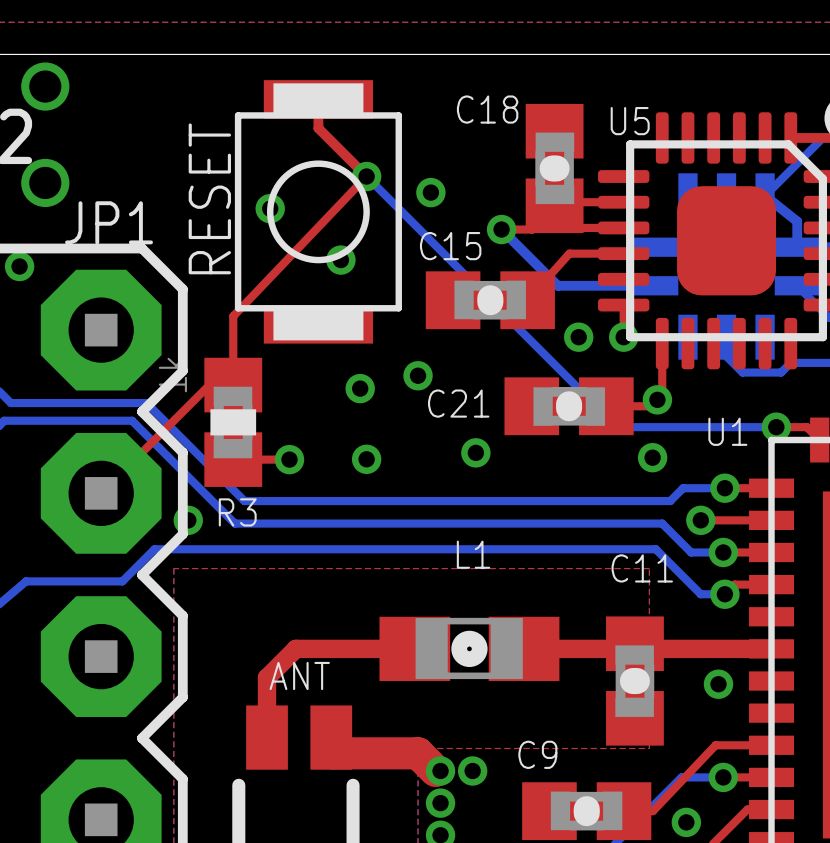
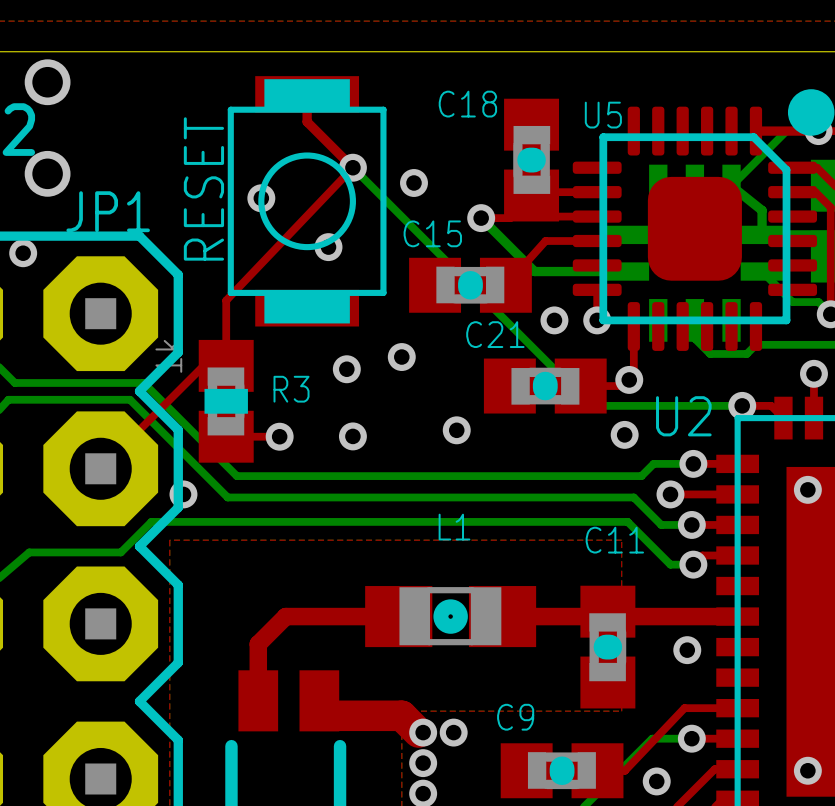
C21 name position: C21 (458, 403) -> C21 (495, 334)
U1 name: U1 (727, 431) -> U2 (683, 416)
R3 name position: R3 (237, 512) -> R3 (291, 389)
text: ANT (299, 675) -> none

